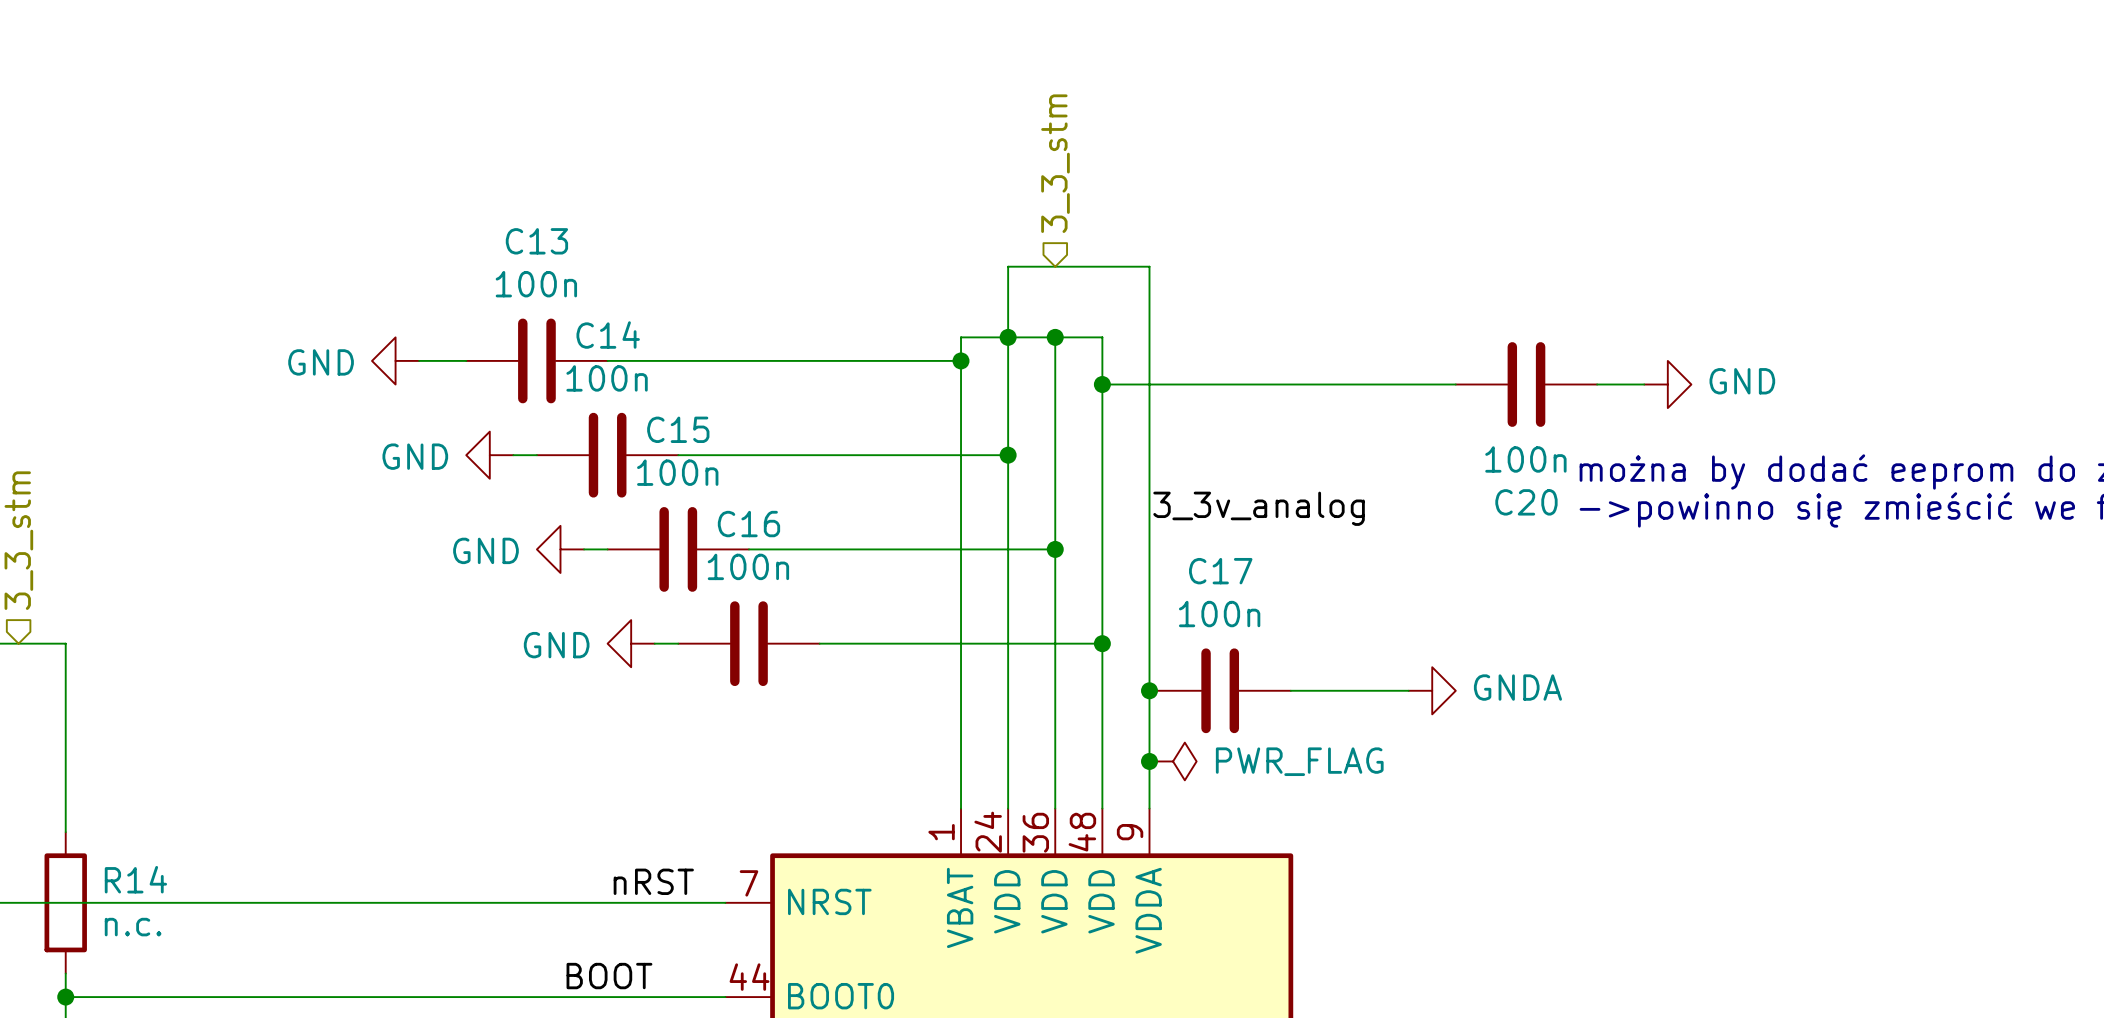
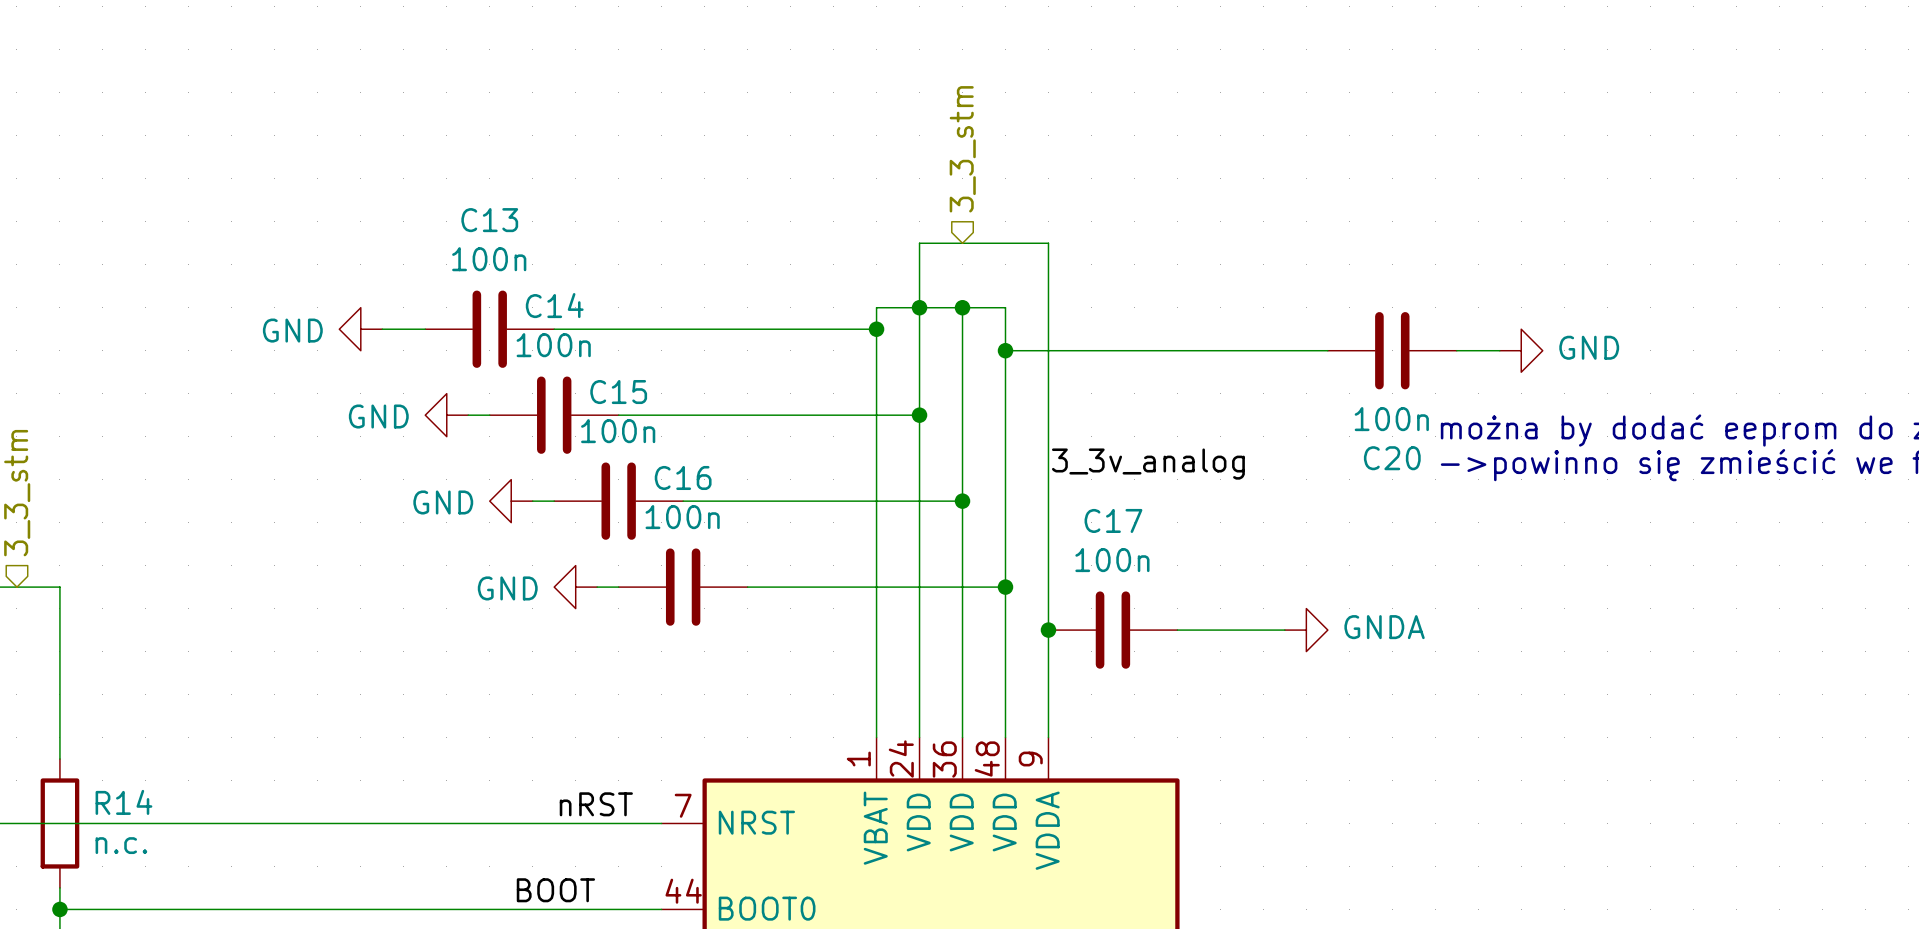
junction: (1149, 761) -> none
power symbol: PWR_FLAG (1173, 761) -> none

